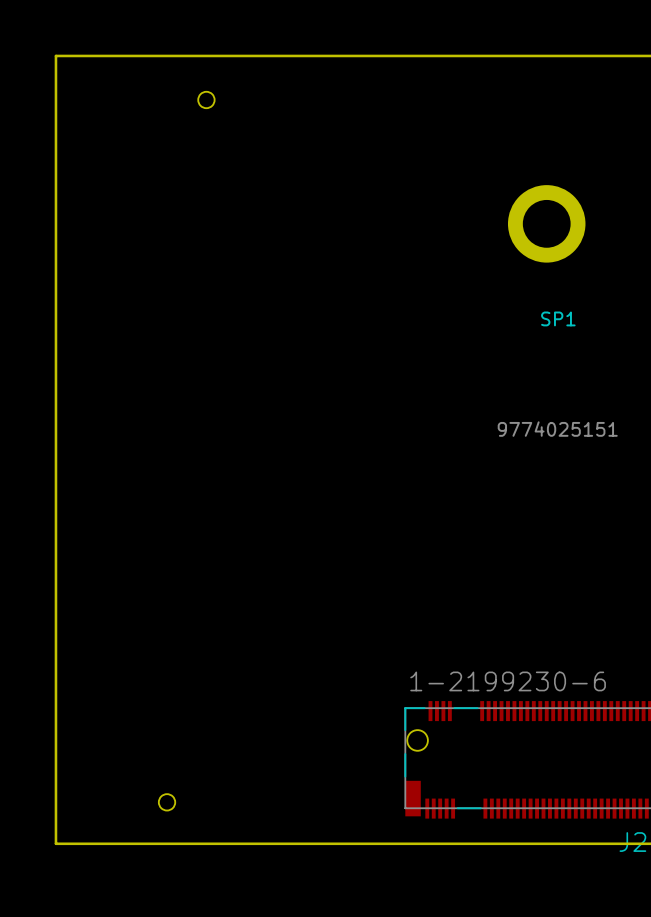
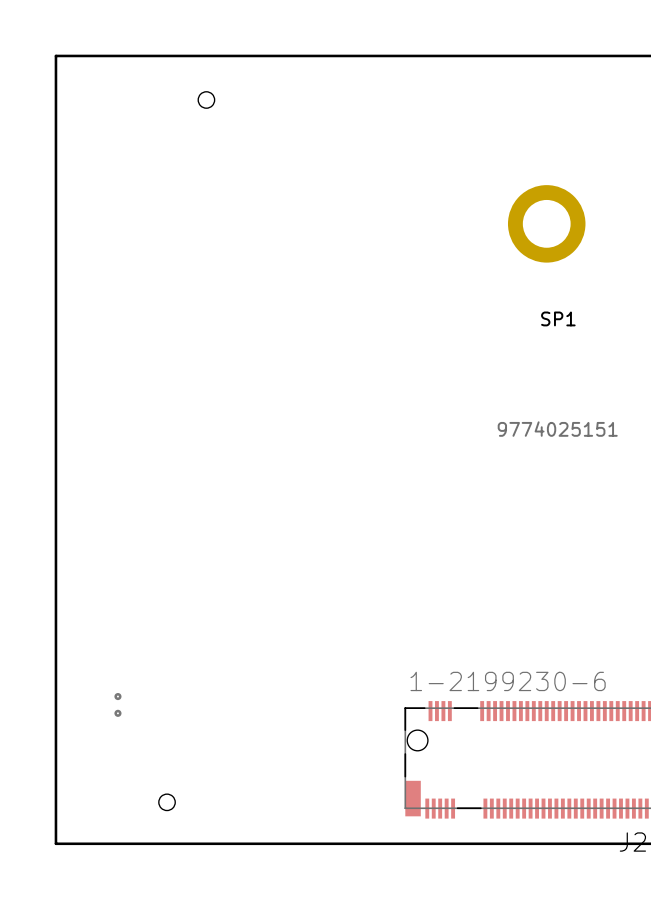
via: none -> (117, 696)
via: none -> (117, 713)

